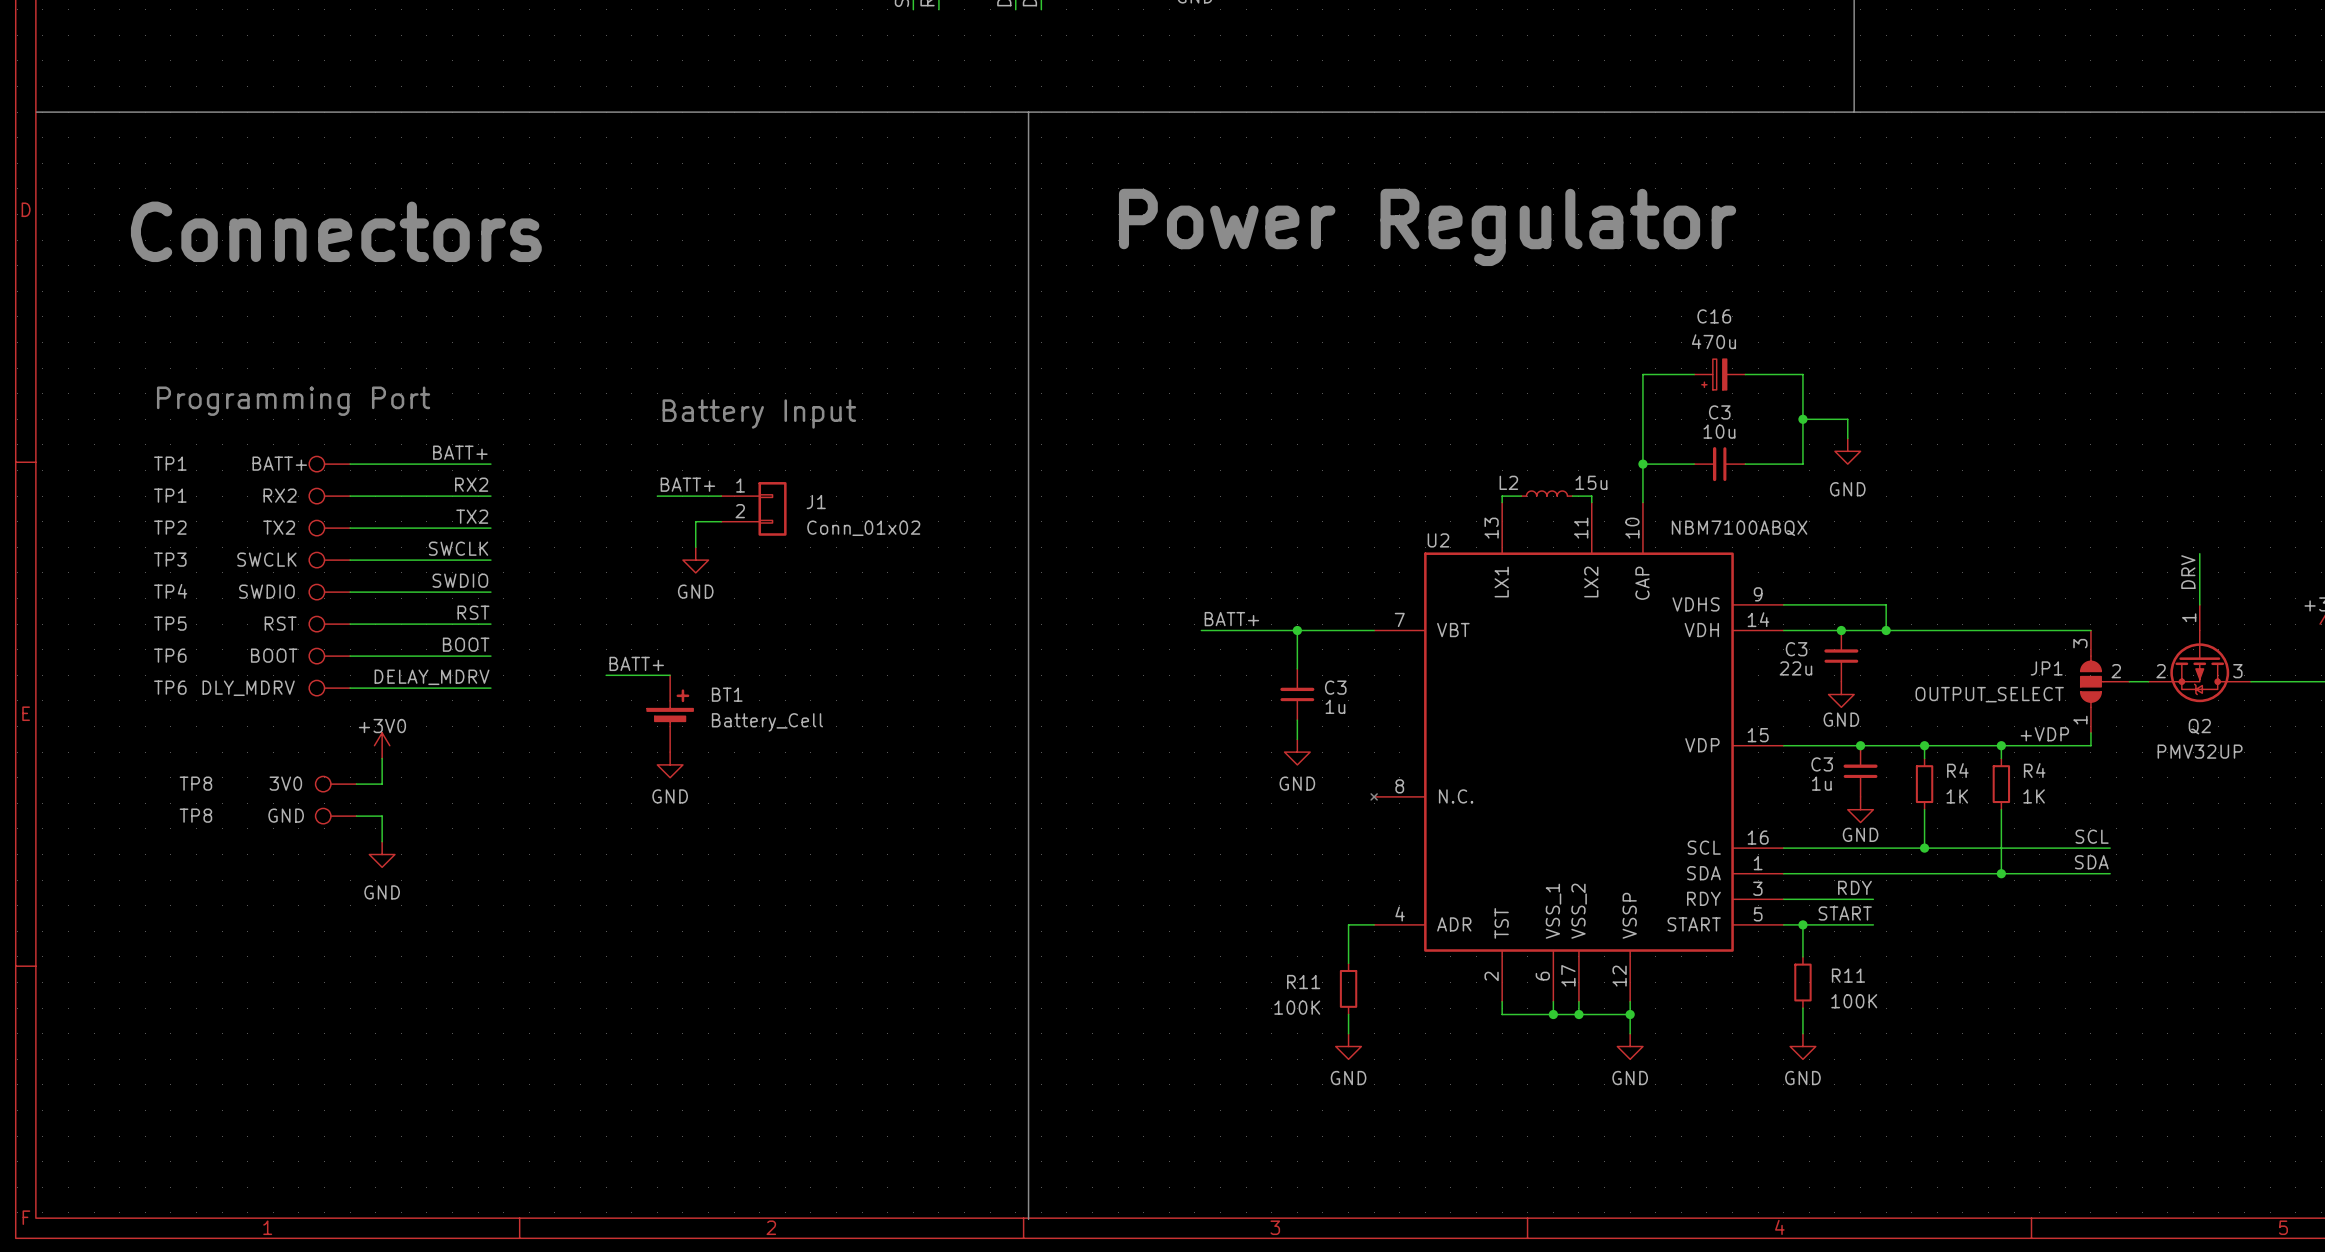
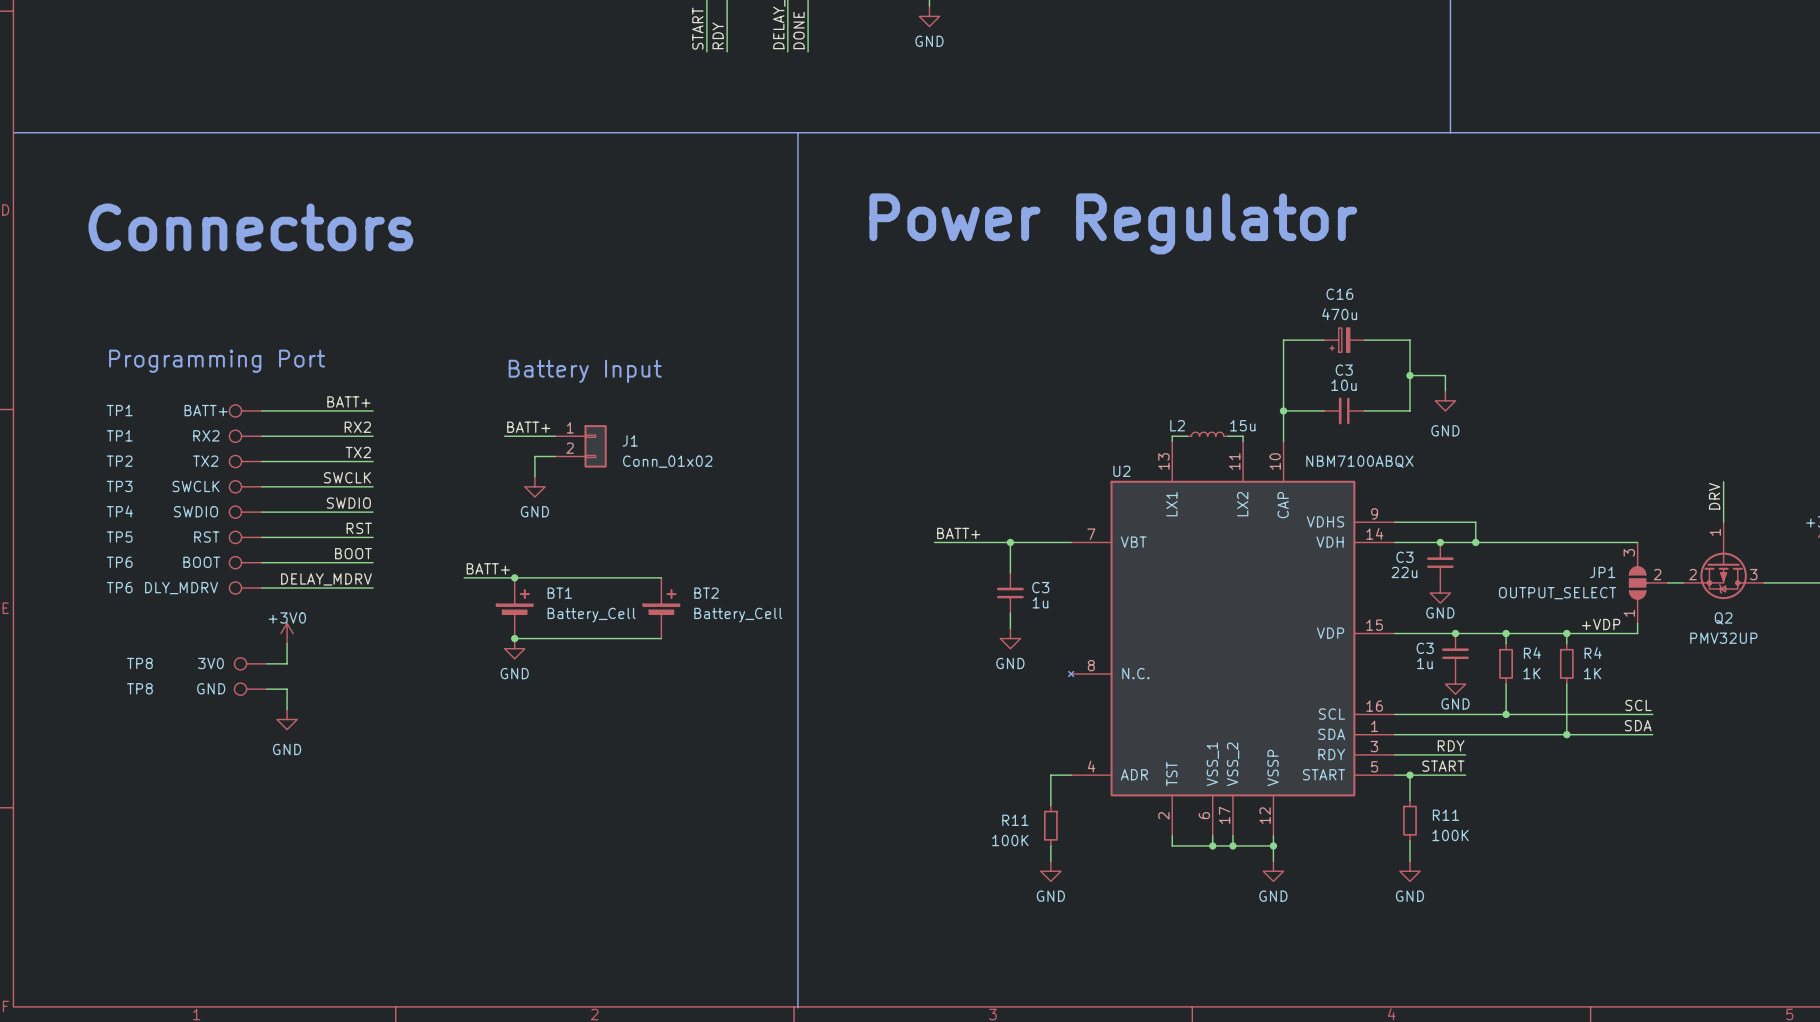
wire: none -> (514, 577) (661, 577)
junction: none -> (514, 577)
BT2: none -> Battery_Cell (661, 608)
wire: none -> (514, 638) (661, 638)
junction: none -> (514, 638)

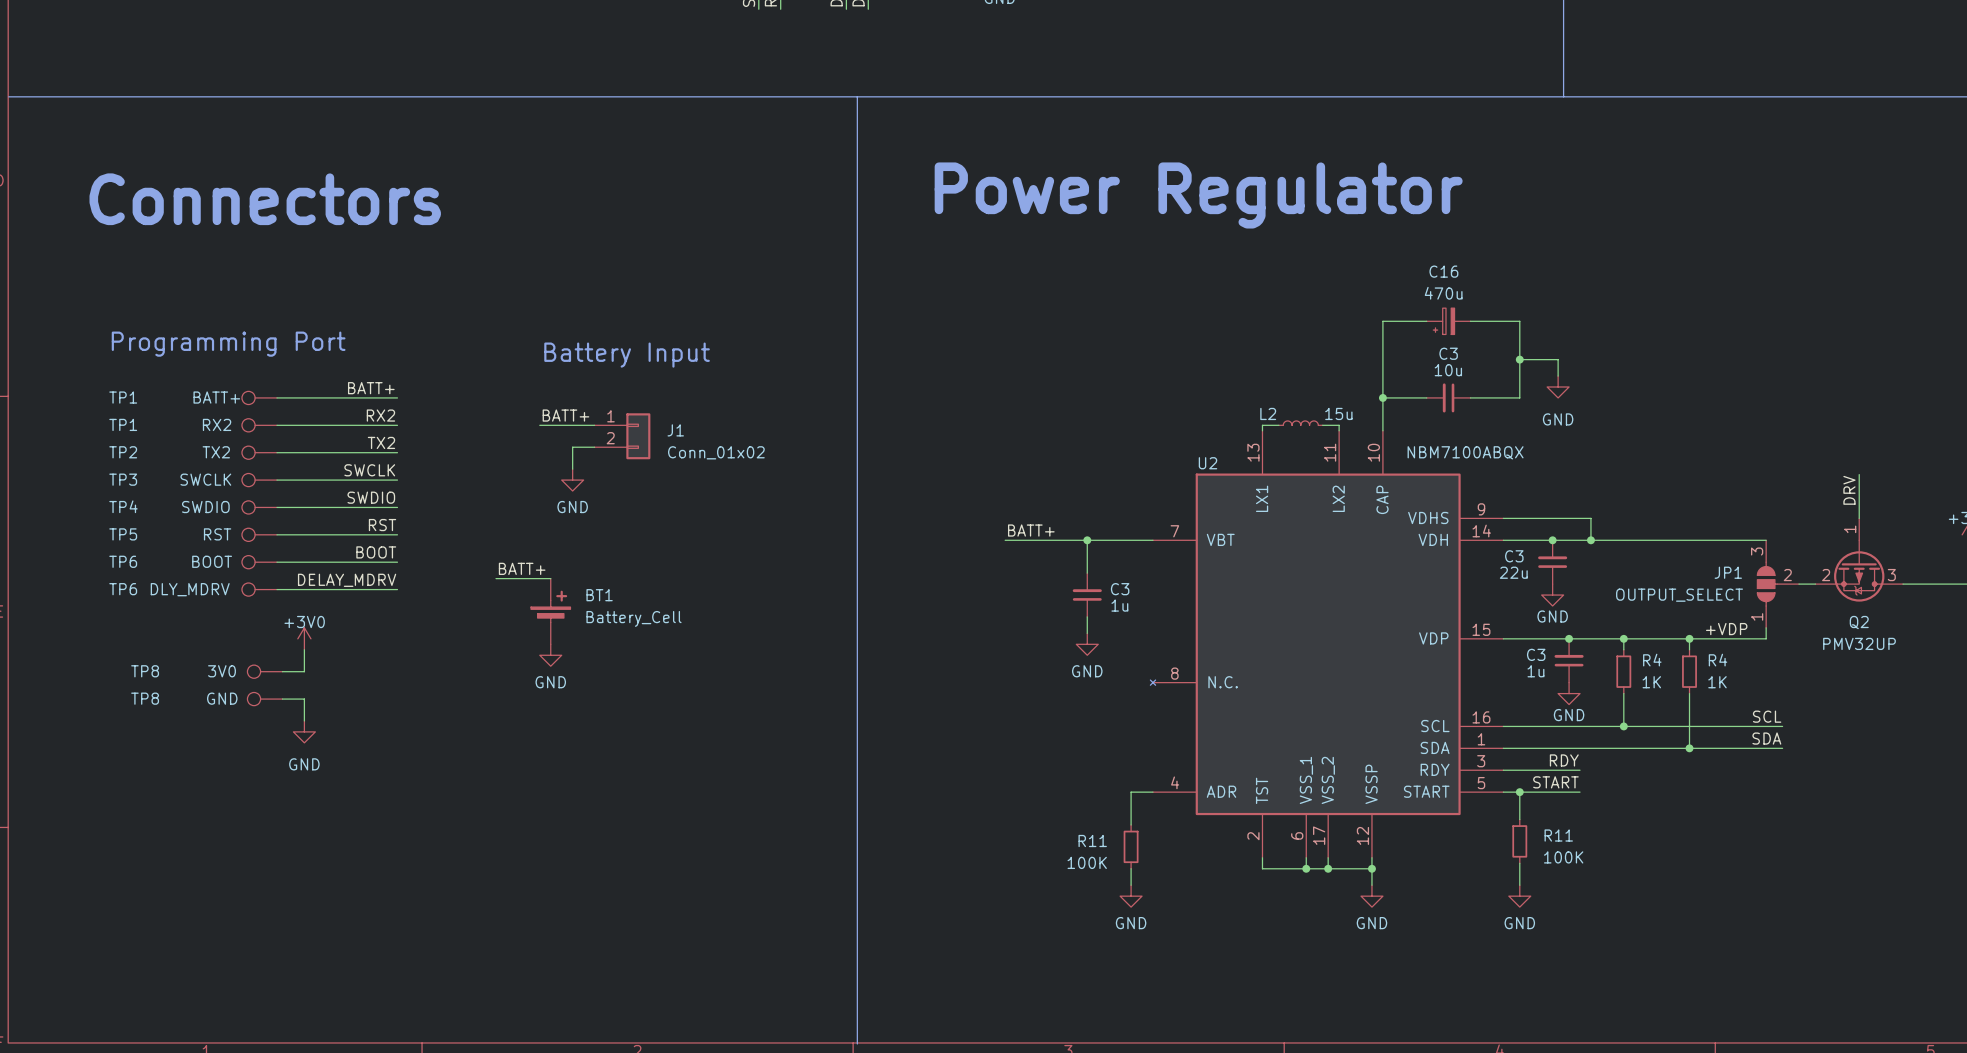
wire: (514, 577) (661, 577) -> none
junction: (514, 577) -> none
BT2: Battery_Cell (661, 608) -> none
wire: (514, 638) (661, 638) -> none
junction: (514, 638) -> none

